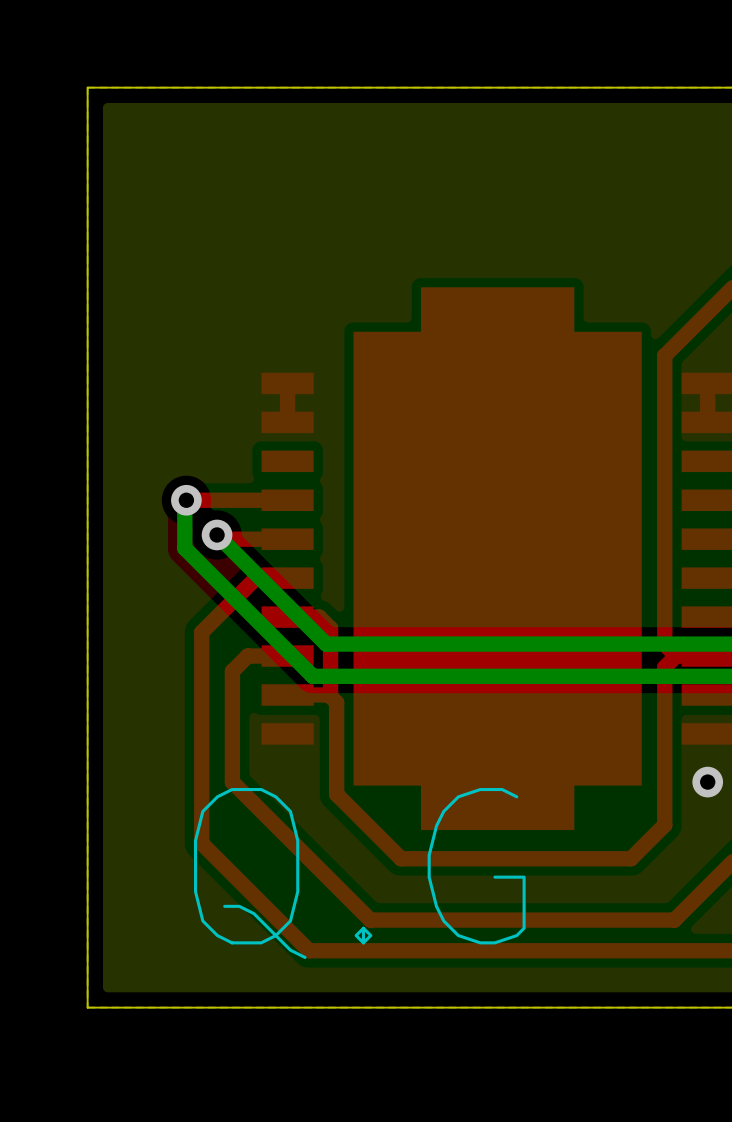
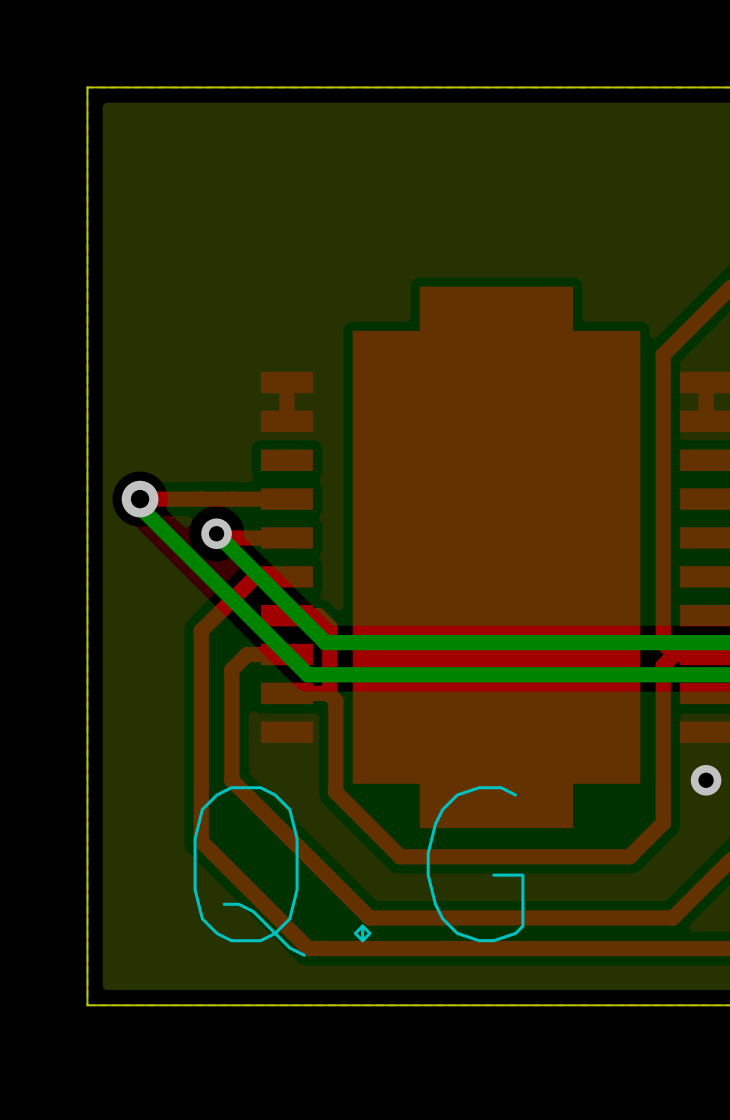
via: none -> (140, 499)
top track: none -> (185, 499) (140, 499)
bottom track: (186, 500) (184, 501) (184, 548) (312, 676) -> (140, 499) (140, 507) (307, 674) (312, 674)
via: (186, 500) -> none

